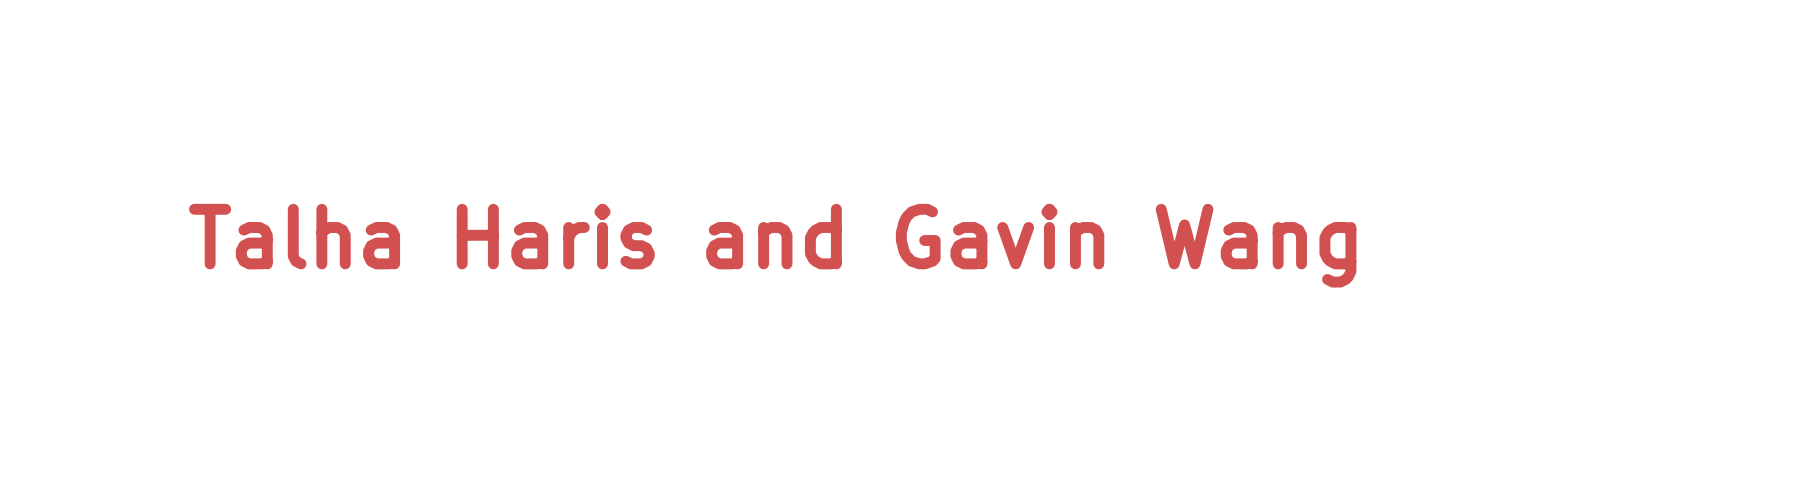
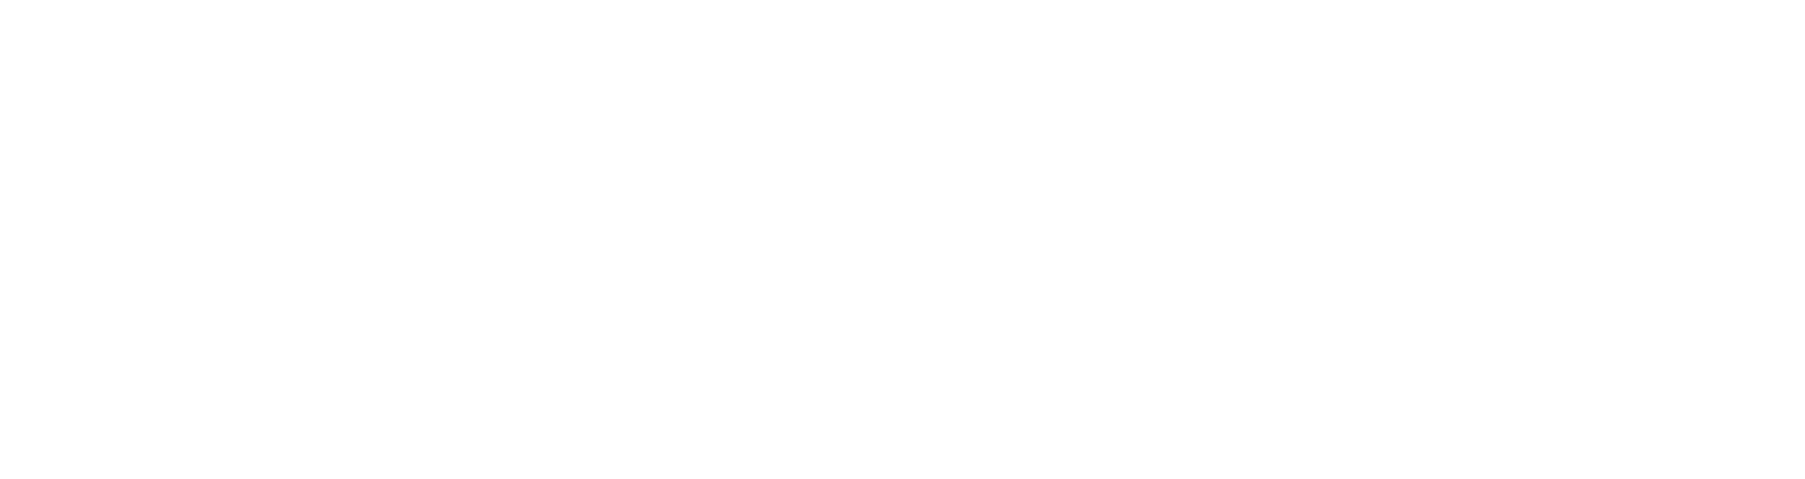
text: Talha Haris and Gavin Wang (772, 245) -> none

